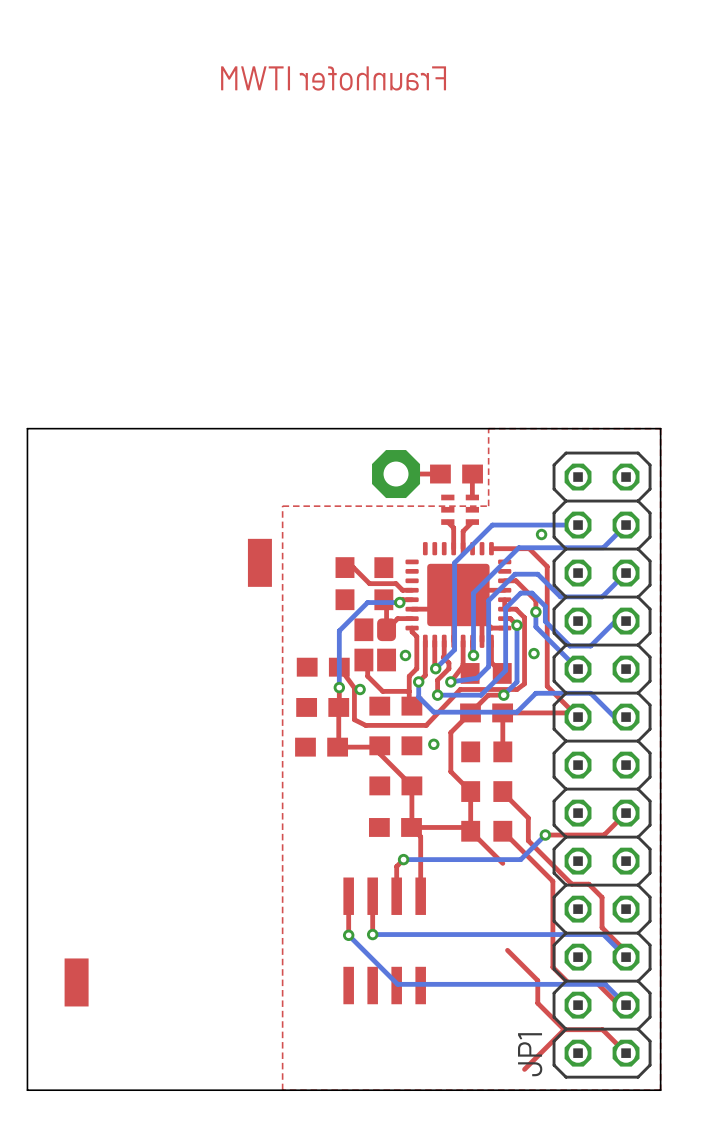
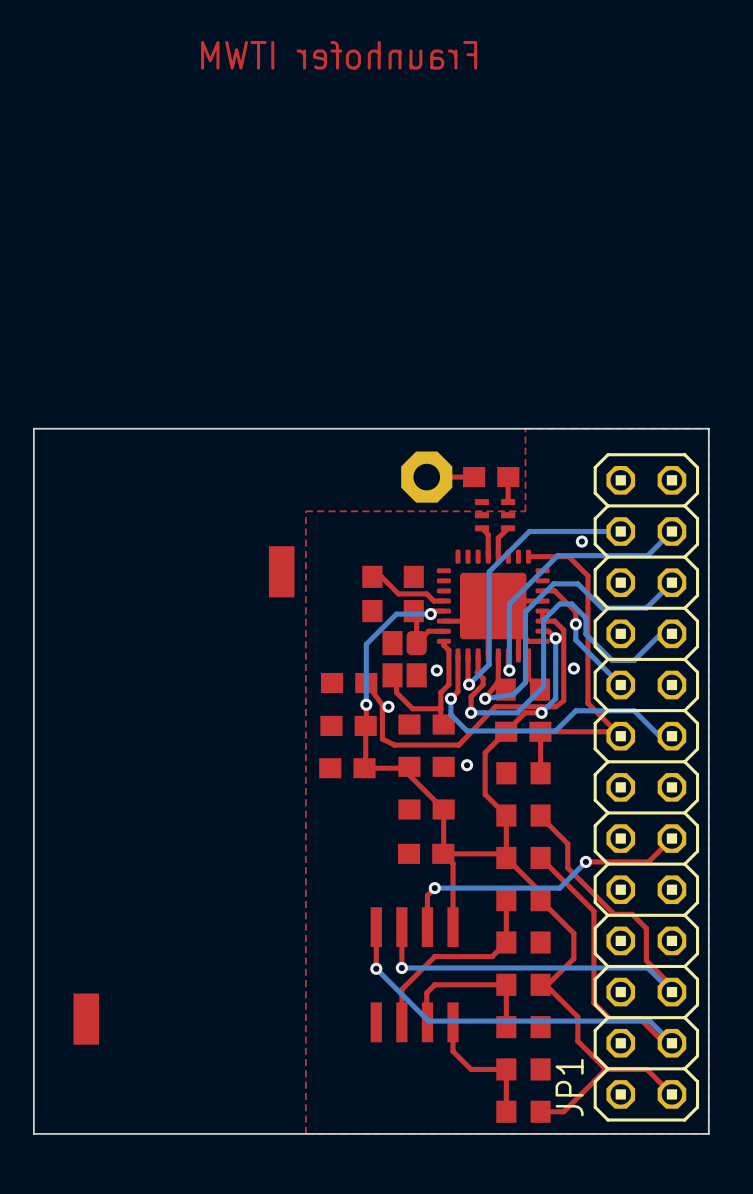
top track: none -> (540, 892) (540, 900) (573, 933) (573, 958) (547, 984) (540, 984)
top track: none -> (506, 900) (506, 942) (492, 956) (434, 956) (401, 989) (401, 1022)
part: none -> (523, 900)
part: none -> (523, 942)
part: none -> (523, 984)
top track: none -> (427, 1022) (426, 992) (434, 984) (506, 984) (506, 1027)
top track: none -> (453, 1022) (453, 1051) (471, 1069) (506, 1069) (506, 1111)
part: none -> (523, 1027)
part: none -> (523, 1069)
part: none -> (523, 1111)
top track: none -> (563, 1111) (540, 1111)

